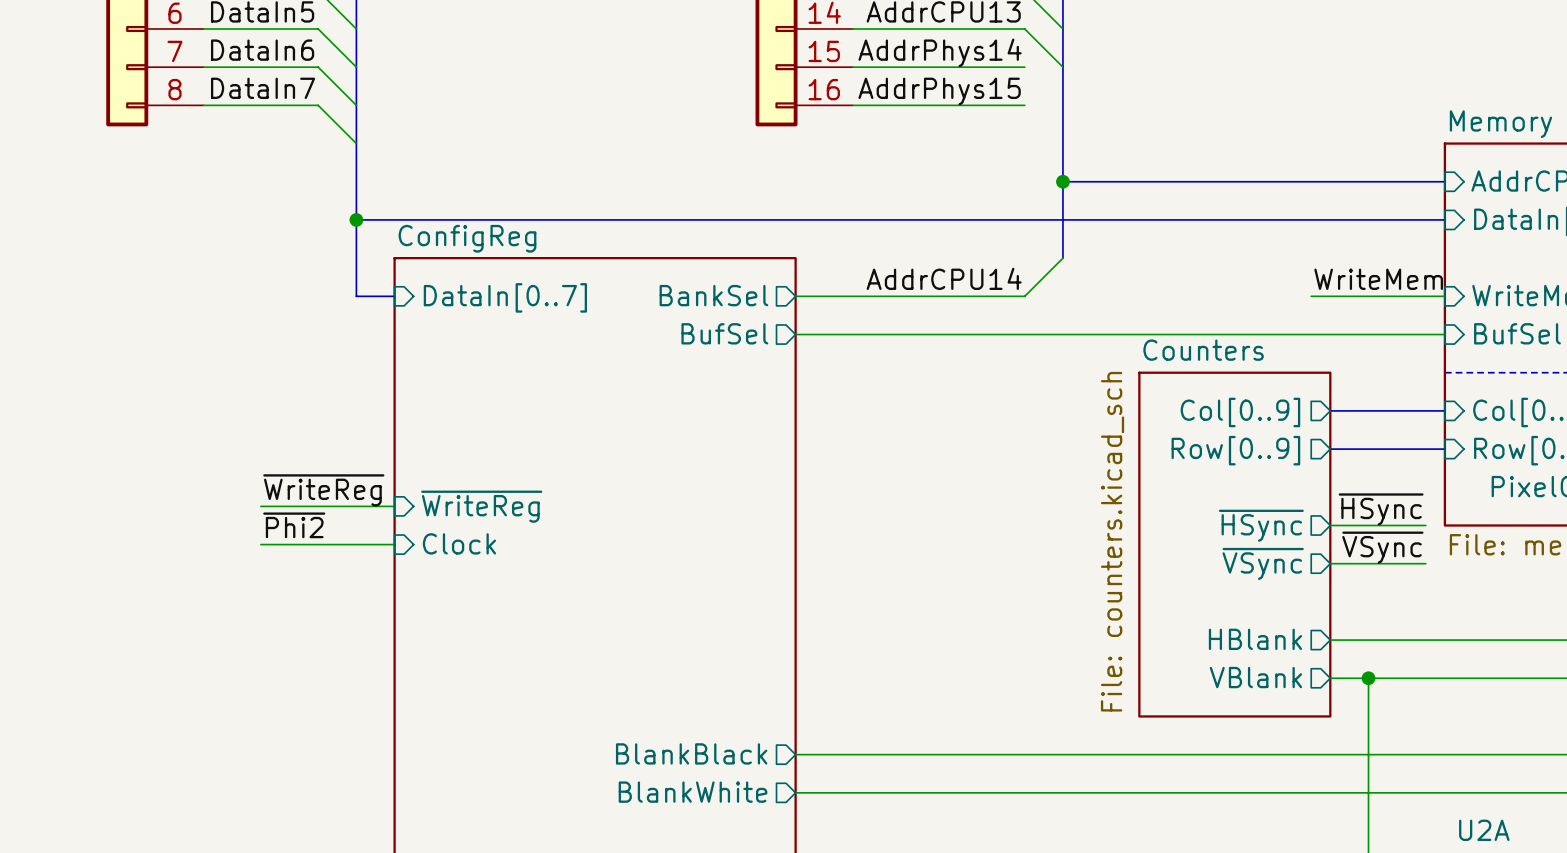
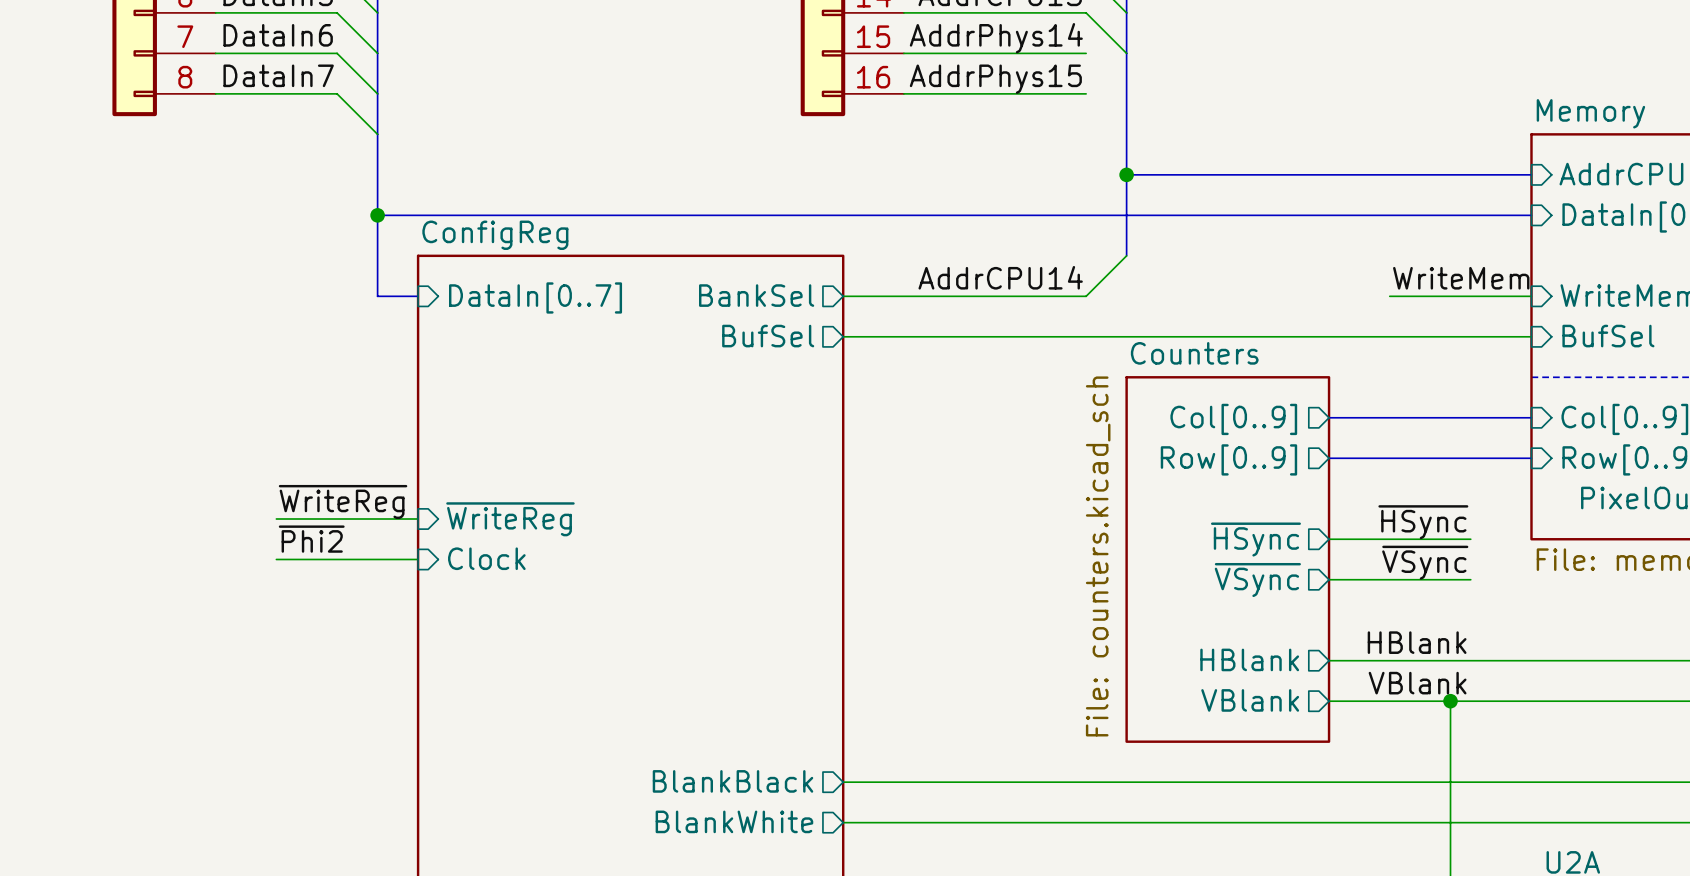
bus: none -> (1329, 417) (1410, 417)
sheet pin position: Col[0..9] (1240, 412) -> Col[0..9] (1233, 419)
bus: none -> (1329, 458) (1410, 458)
sheet pin position: Row[0..9] (1235, 450) -> Row[0..9] (1228, 459)
label position: ~{HSync} (1381, 509) -> ~{HSync} (1423, 522)
wire: none -> (1329, 539) (1410, 539)
sheet pin position: ~{HSync} (1261, 525) -> ~{HSync} (1255, 539)
wire: (1387, 525) (1425, 525) -> none
sheet Counters position: (1234, 544) -> (1227, 559)
label position: ~{VSync} (1382, 547) -> ~{VSync} (1425, 562)
wire: none -> (1329, 579) (1410, 579)
sheet pin position: ~{VSync} (1263, 563) -> ~{VSync} (1257, 580)
wire: (1387, 563) (1425, 563) -> none
label: none -> HBlank (1417, 642)
sheet pin position: HBlank (1255, 639) -> HBlank (1249, 659)
wire: none -> (1329, 660) (1410, 660)
label: none -> VBlank (1417, 683)
sheet pin position: VBlank (1255, 677) -> VBlank (1250, 700)
wire: none -> (1329, 701) (1410, 701)

